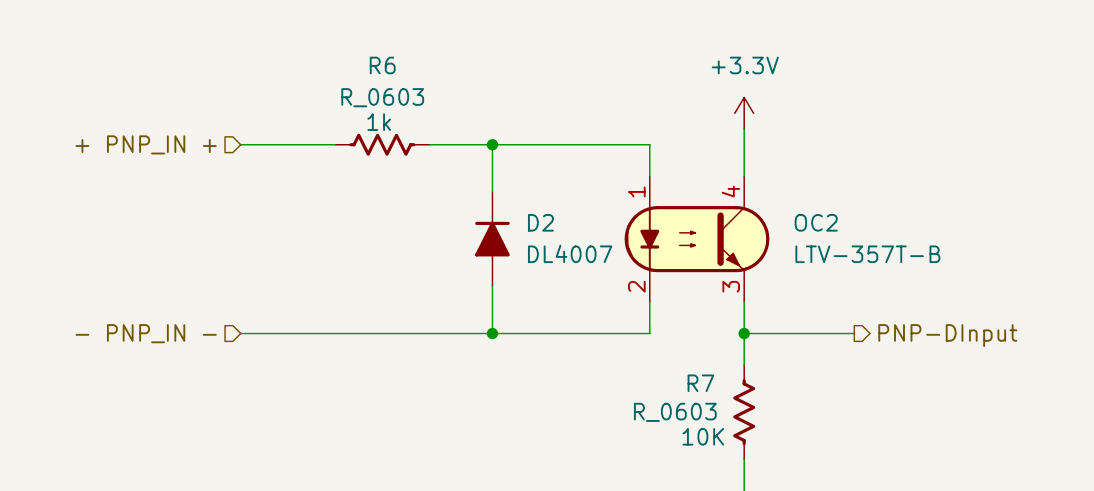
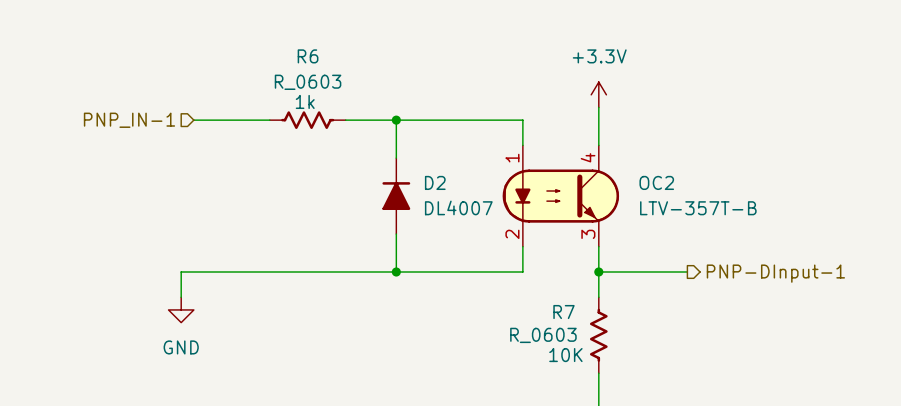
hierarchical label: + PNP_IN + (146, 144) -> PNP_IN-1 (129, 120)
hierarchical label: - PNP_IN - (146, 333) -> none
wire: none -> (193, 271) (181, 271) (181, 297)
hierarchical label: PNP-DInput (947, 335) -> PNP-DInput-1 (775, 273)
power symbol: none -> GND (181, 309)

